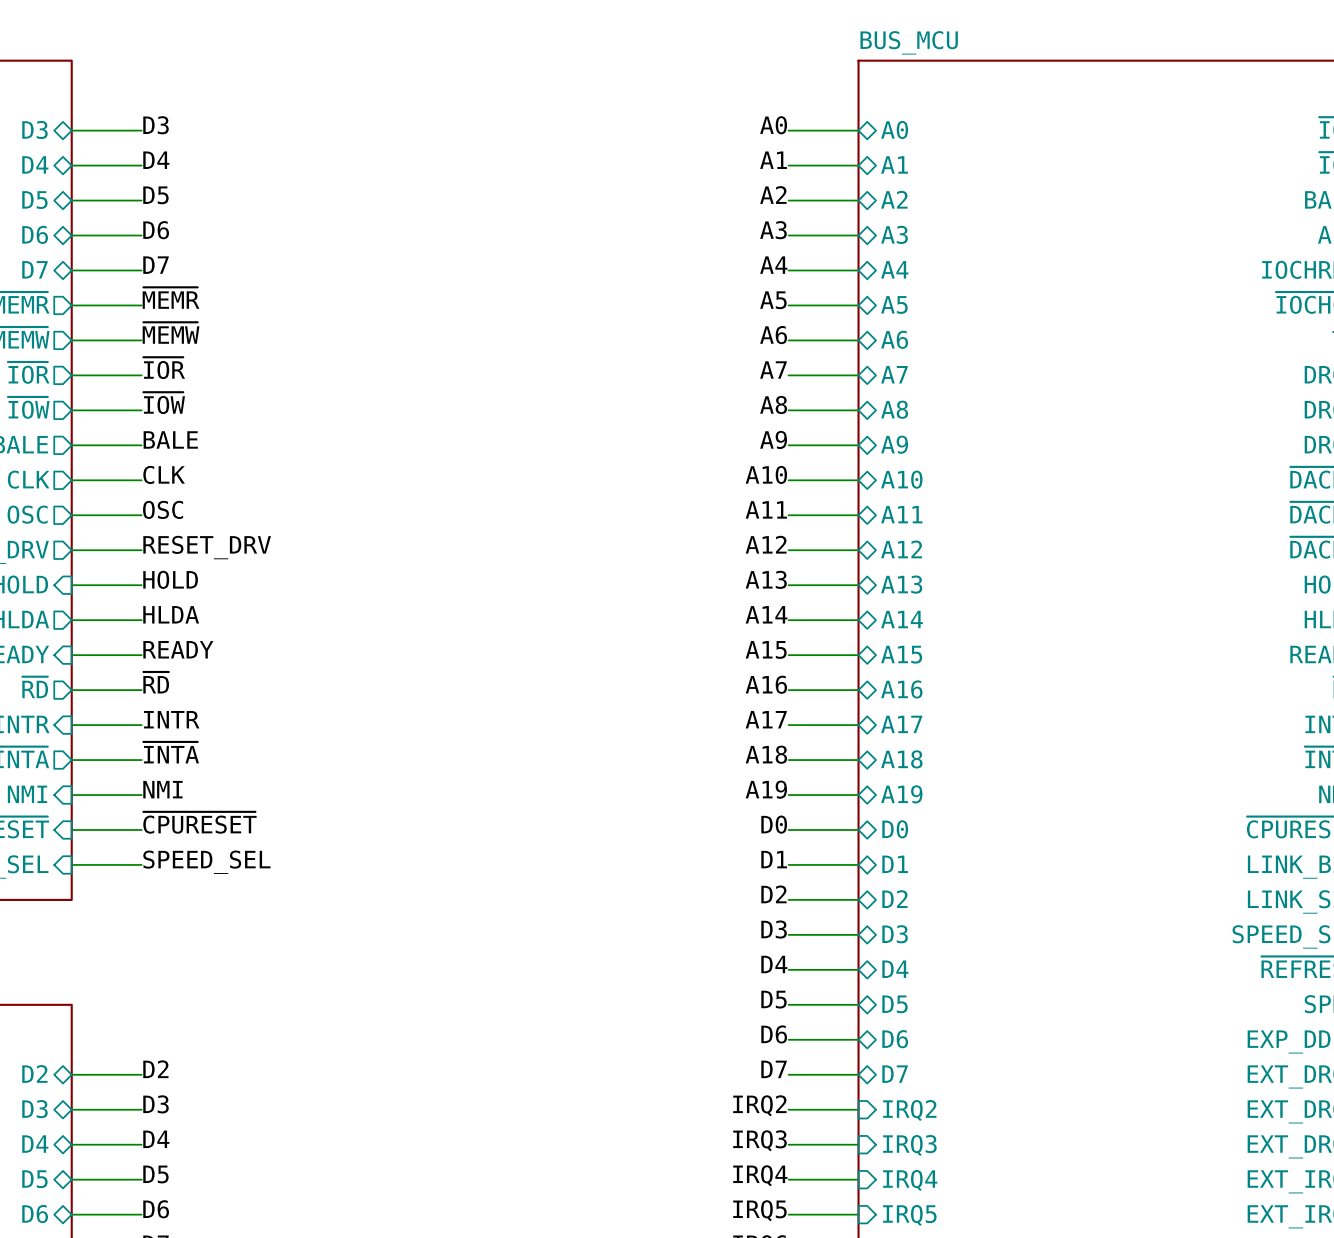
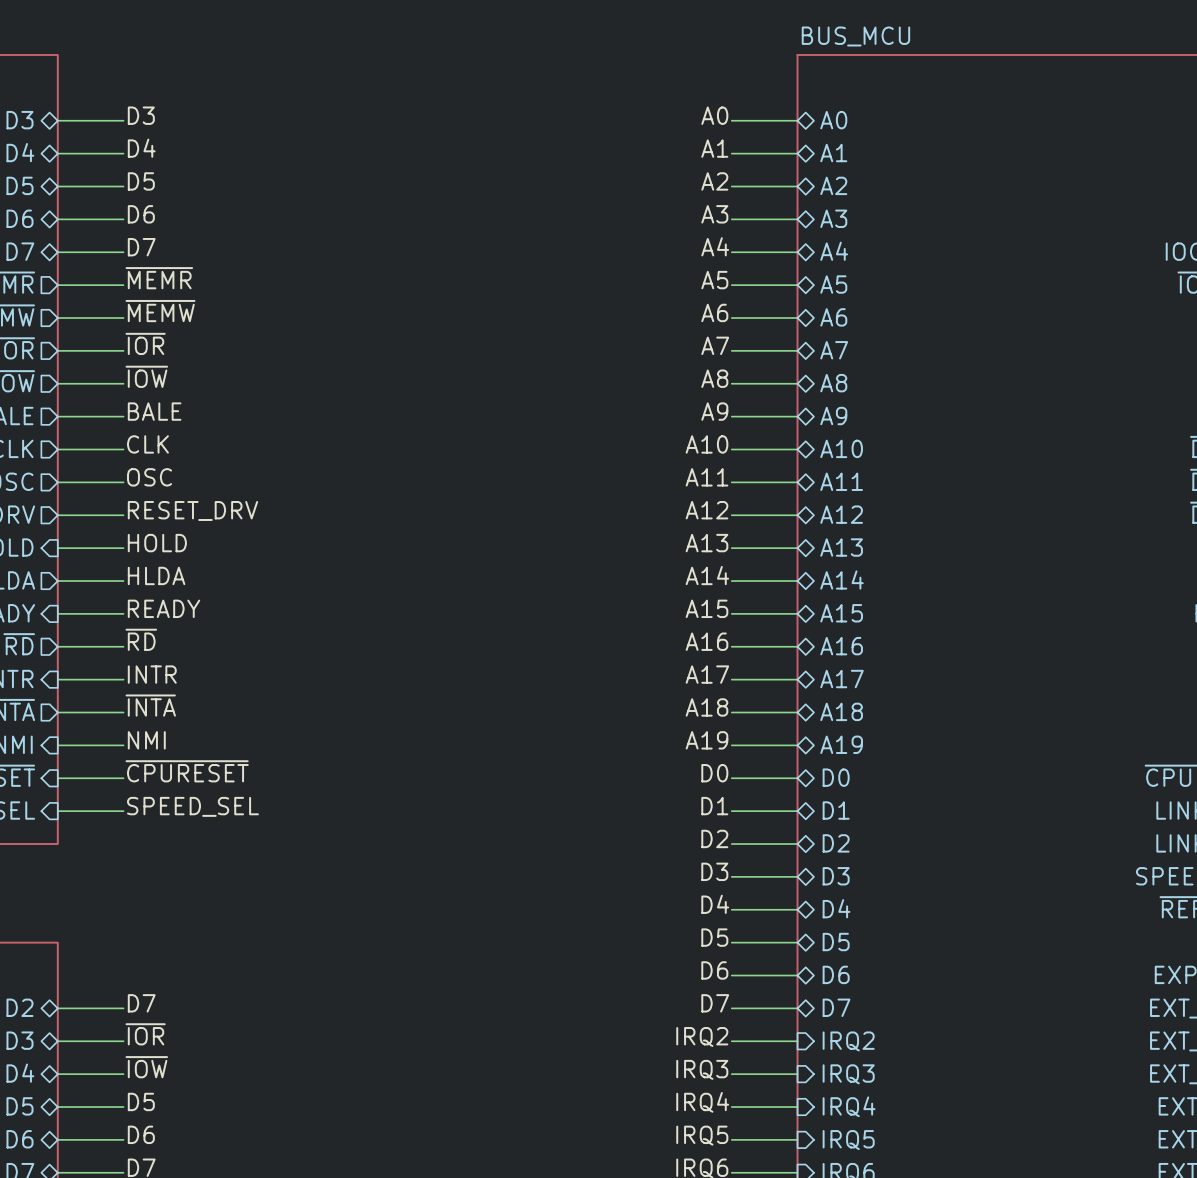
label: D2 (155, 1069) -> D7 (141, 1003)
label: D3 (156, 1104) -> ~{IOR} (145, 1034)
label: D4 (156, 1139) -> ~{IOW} (146, 1067)

